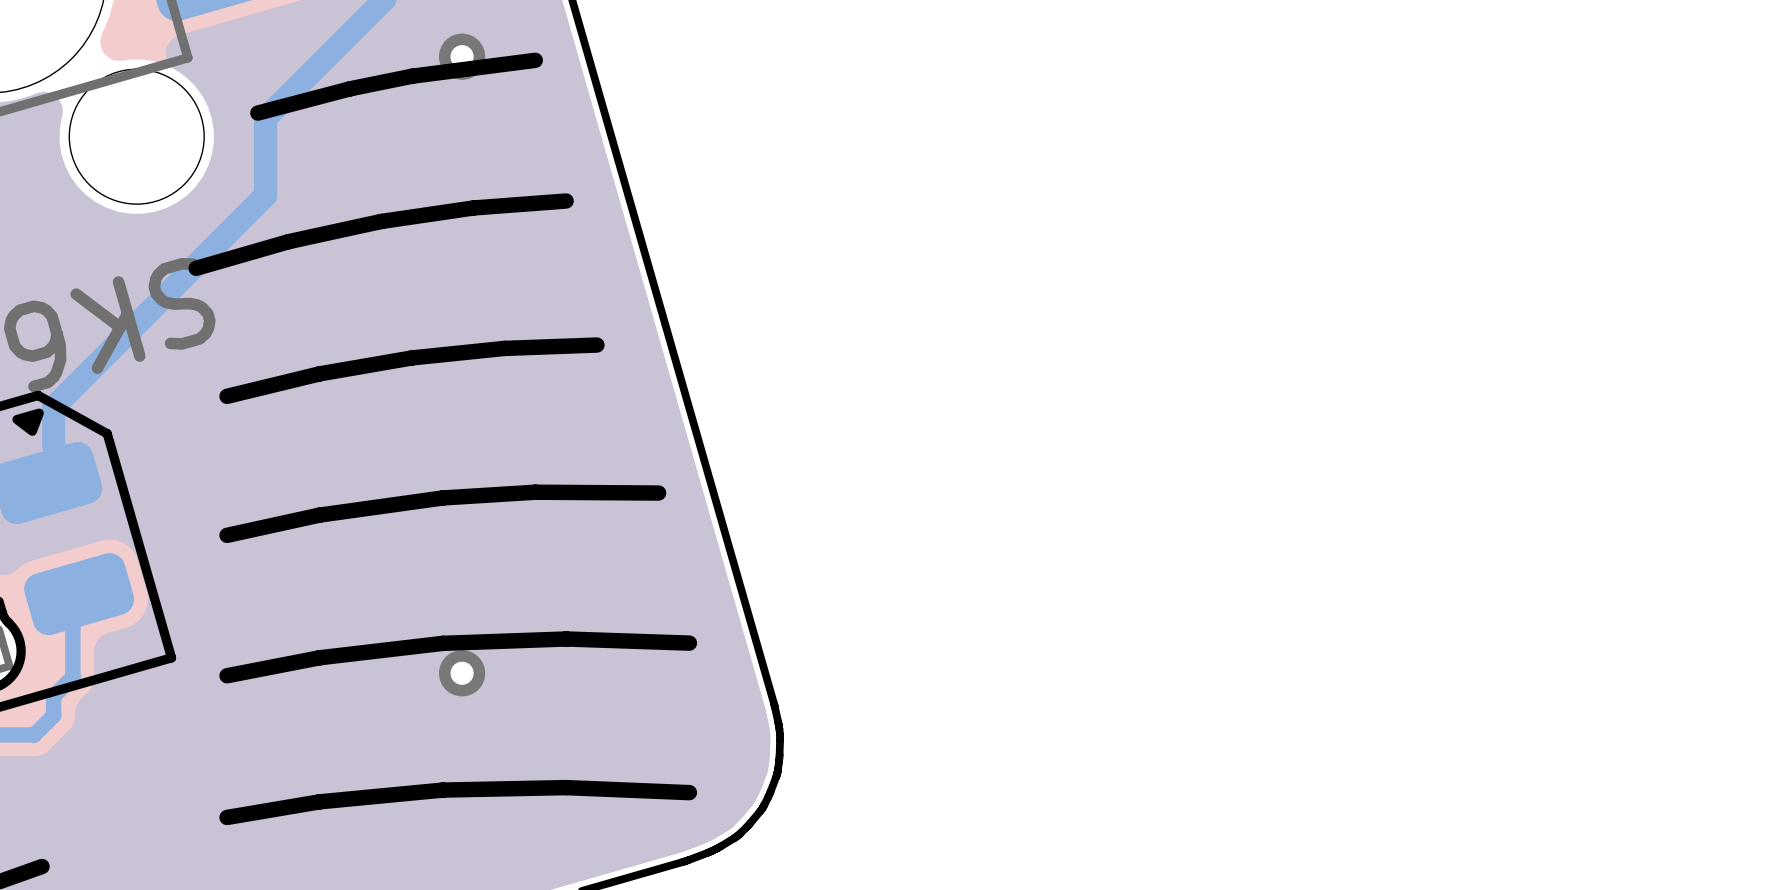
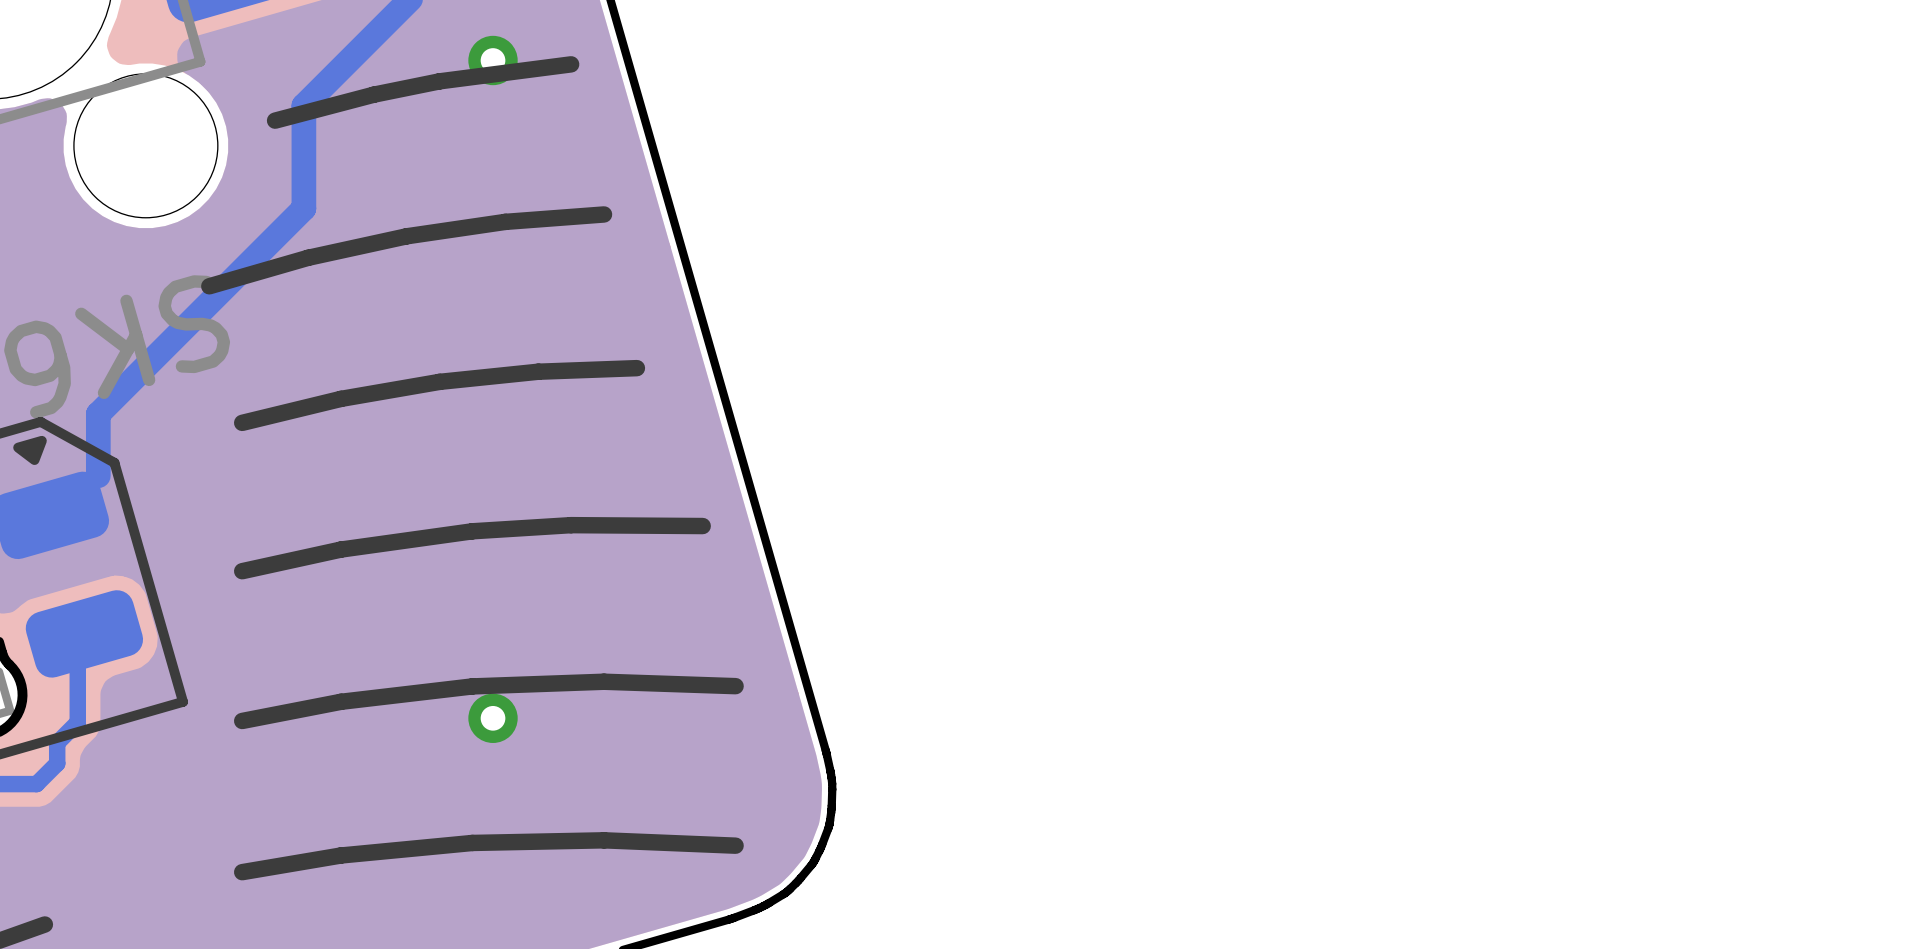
bottom track: (284, 99) (265, 118) (265, 195) (53, 407) (53, 445) -> (303, 105) (303, 208) (98, 414) (98, 475)

